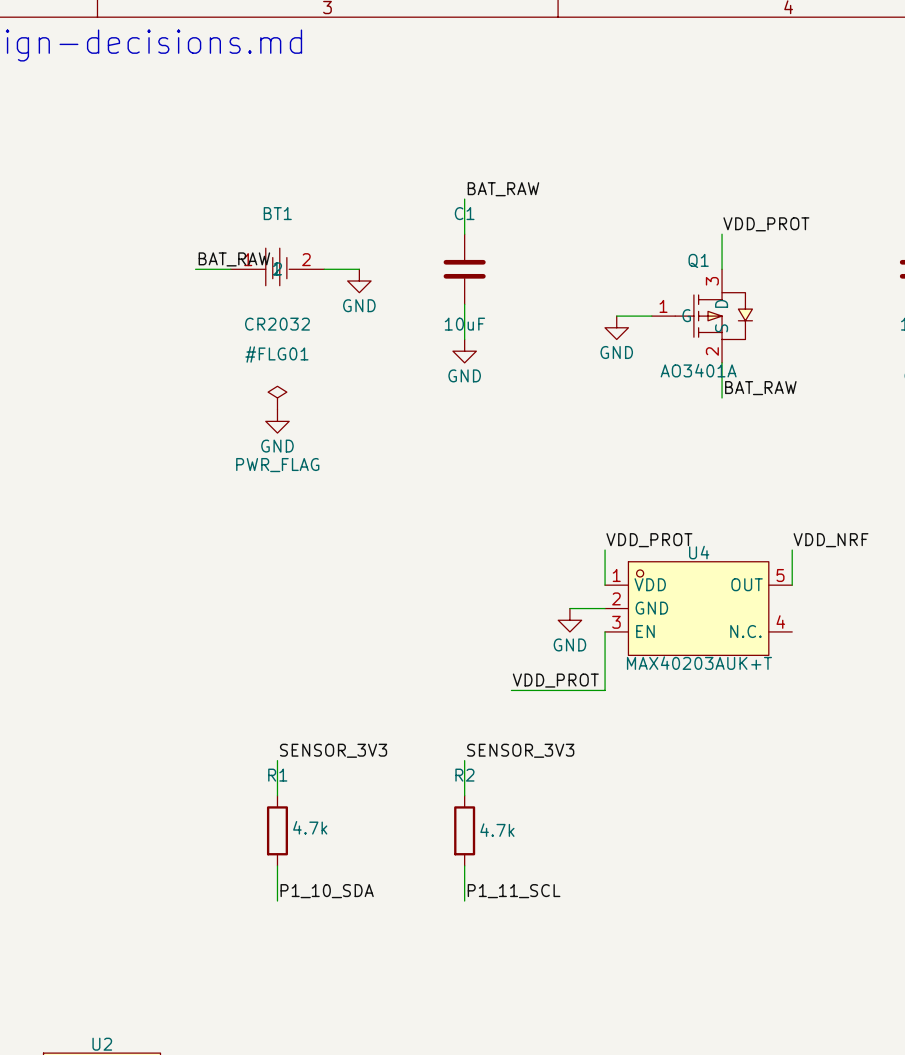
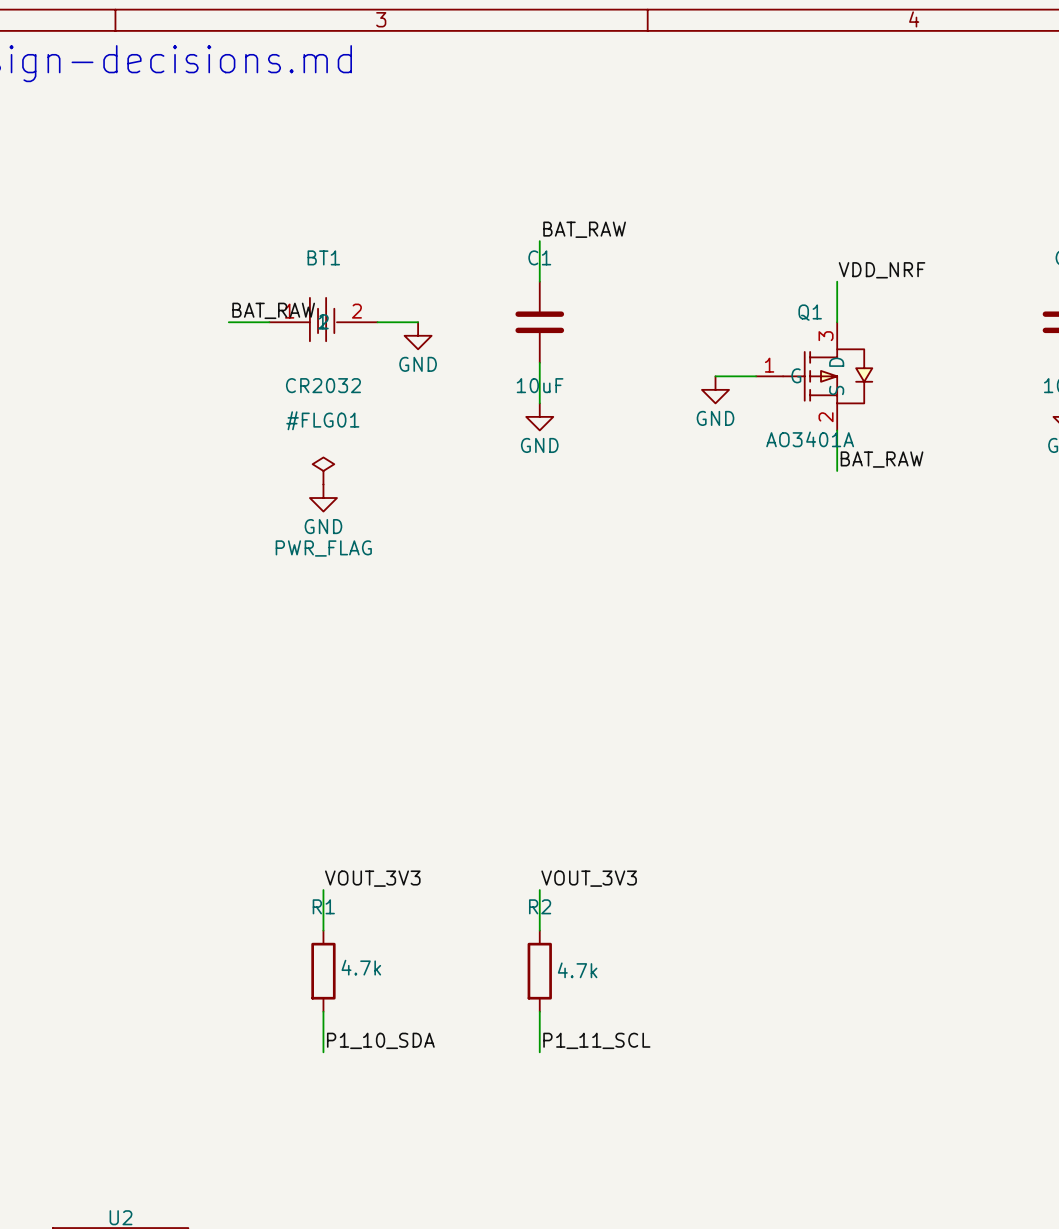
label: VDD_PROT (766, 224) -> VDD_NRF (882, 270)
label: VDD_PROT (649, 540) -> none
label: VDD_NRF (831, 540) -> none
wire: (605, 550) (605, 585) -> none
wire: (792, 550) (792, 585) -> none
wire: (569, 608) (605, 608) -> none
U4: MAX40203AUK+T (698, 608) -> none
power symbol: GND (569, 620) -> none
wire: (605, 631) (605, 690) (511, 690) -> none
label: VDD_PROT (555, 680) -> none
label: SENSOR_3V3 (333, 750) -> VOUT_3V3 (372, 878)
label: SENSOR_3V3 (520, 750) -> VOUT_3V3 (589, 878)

